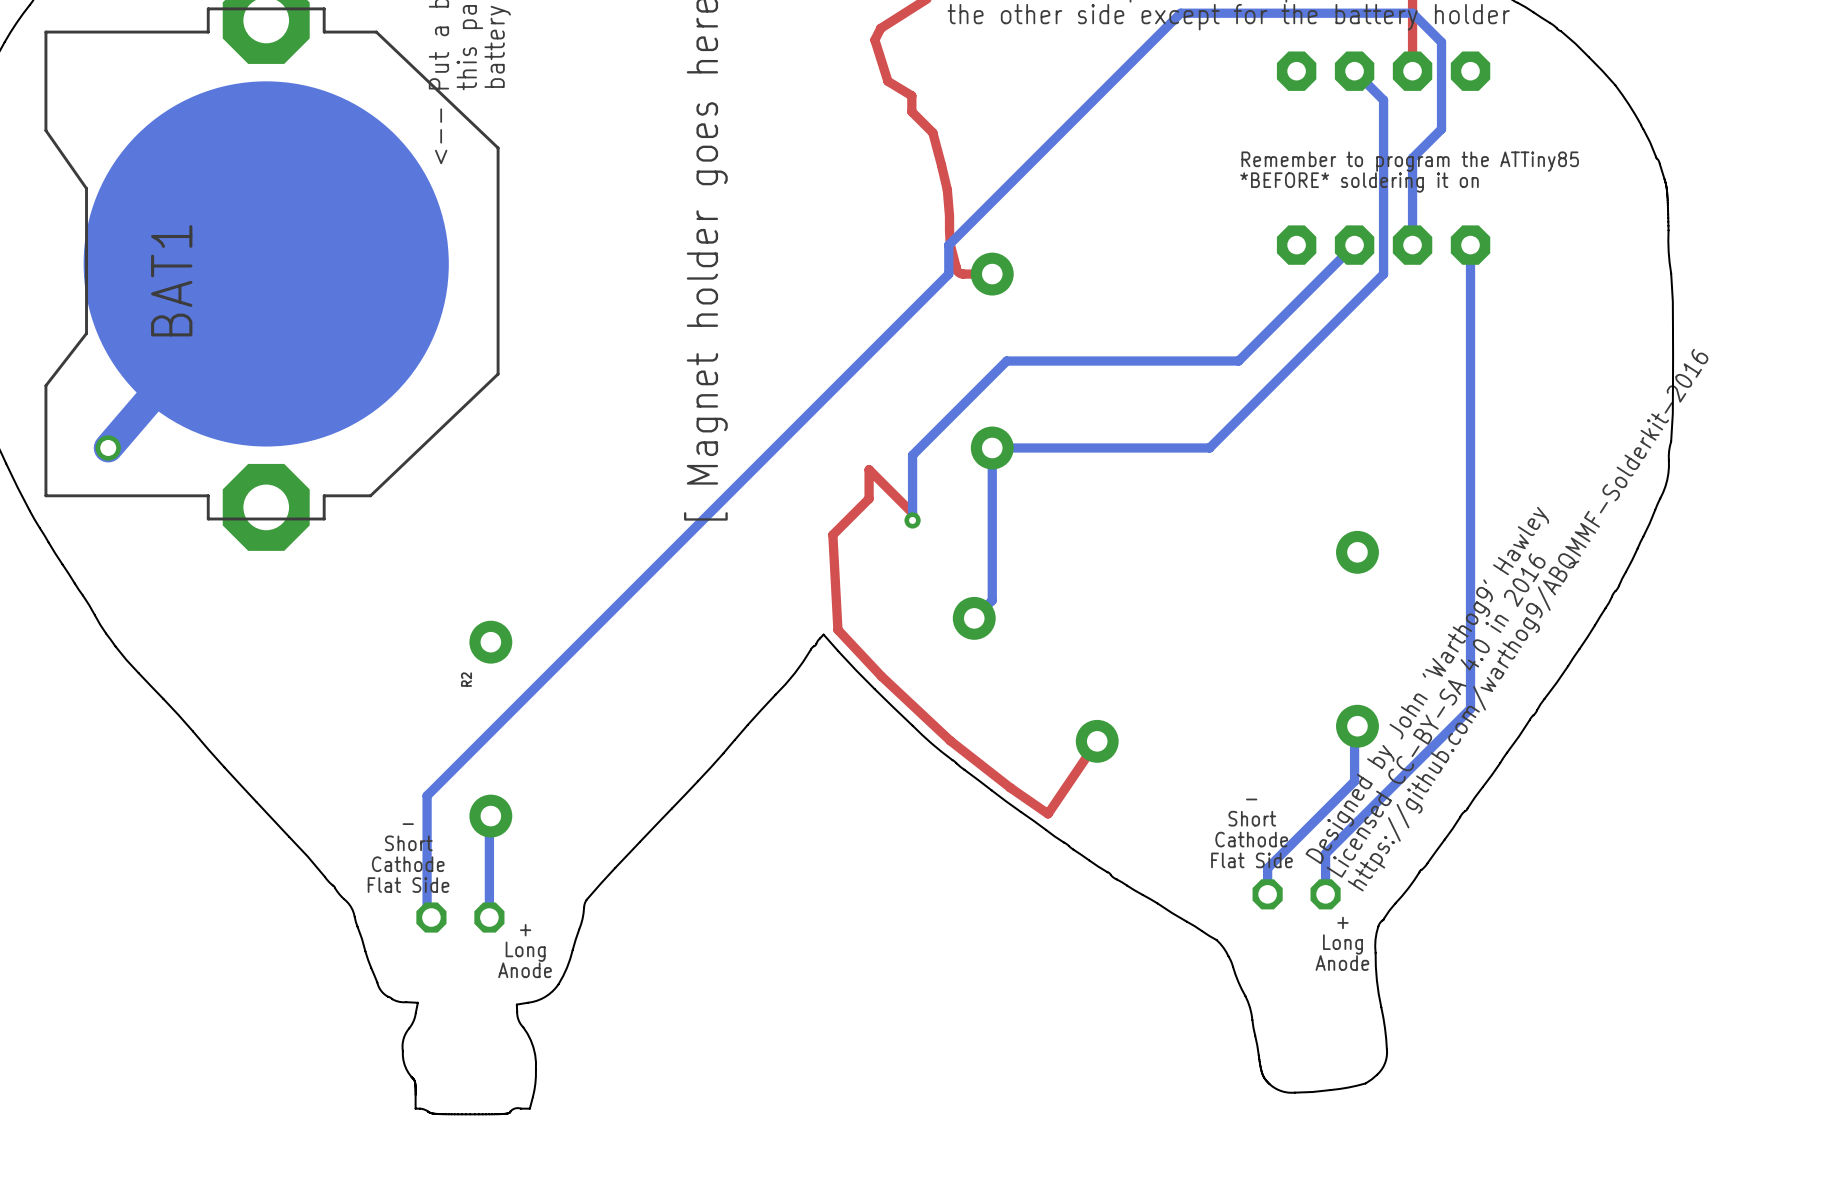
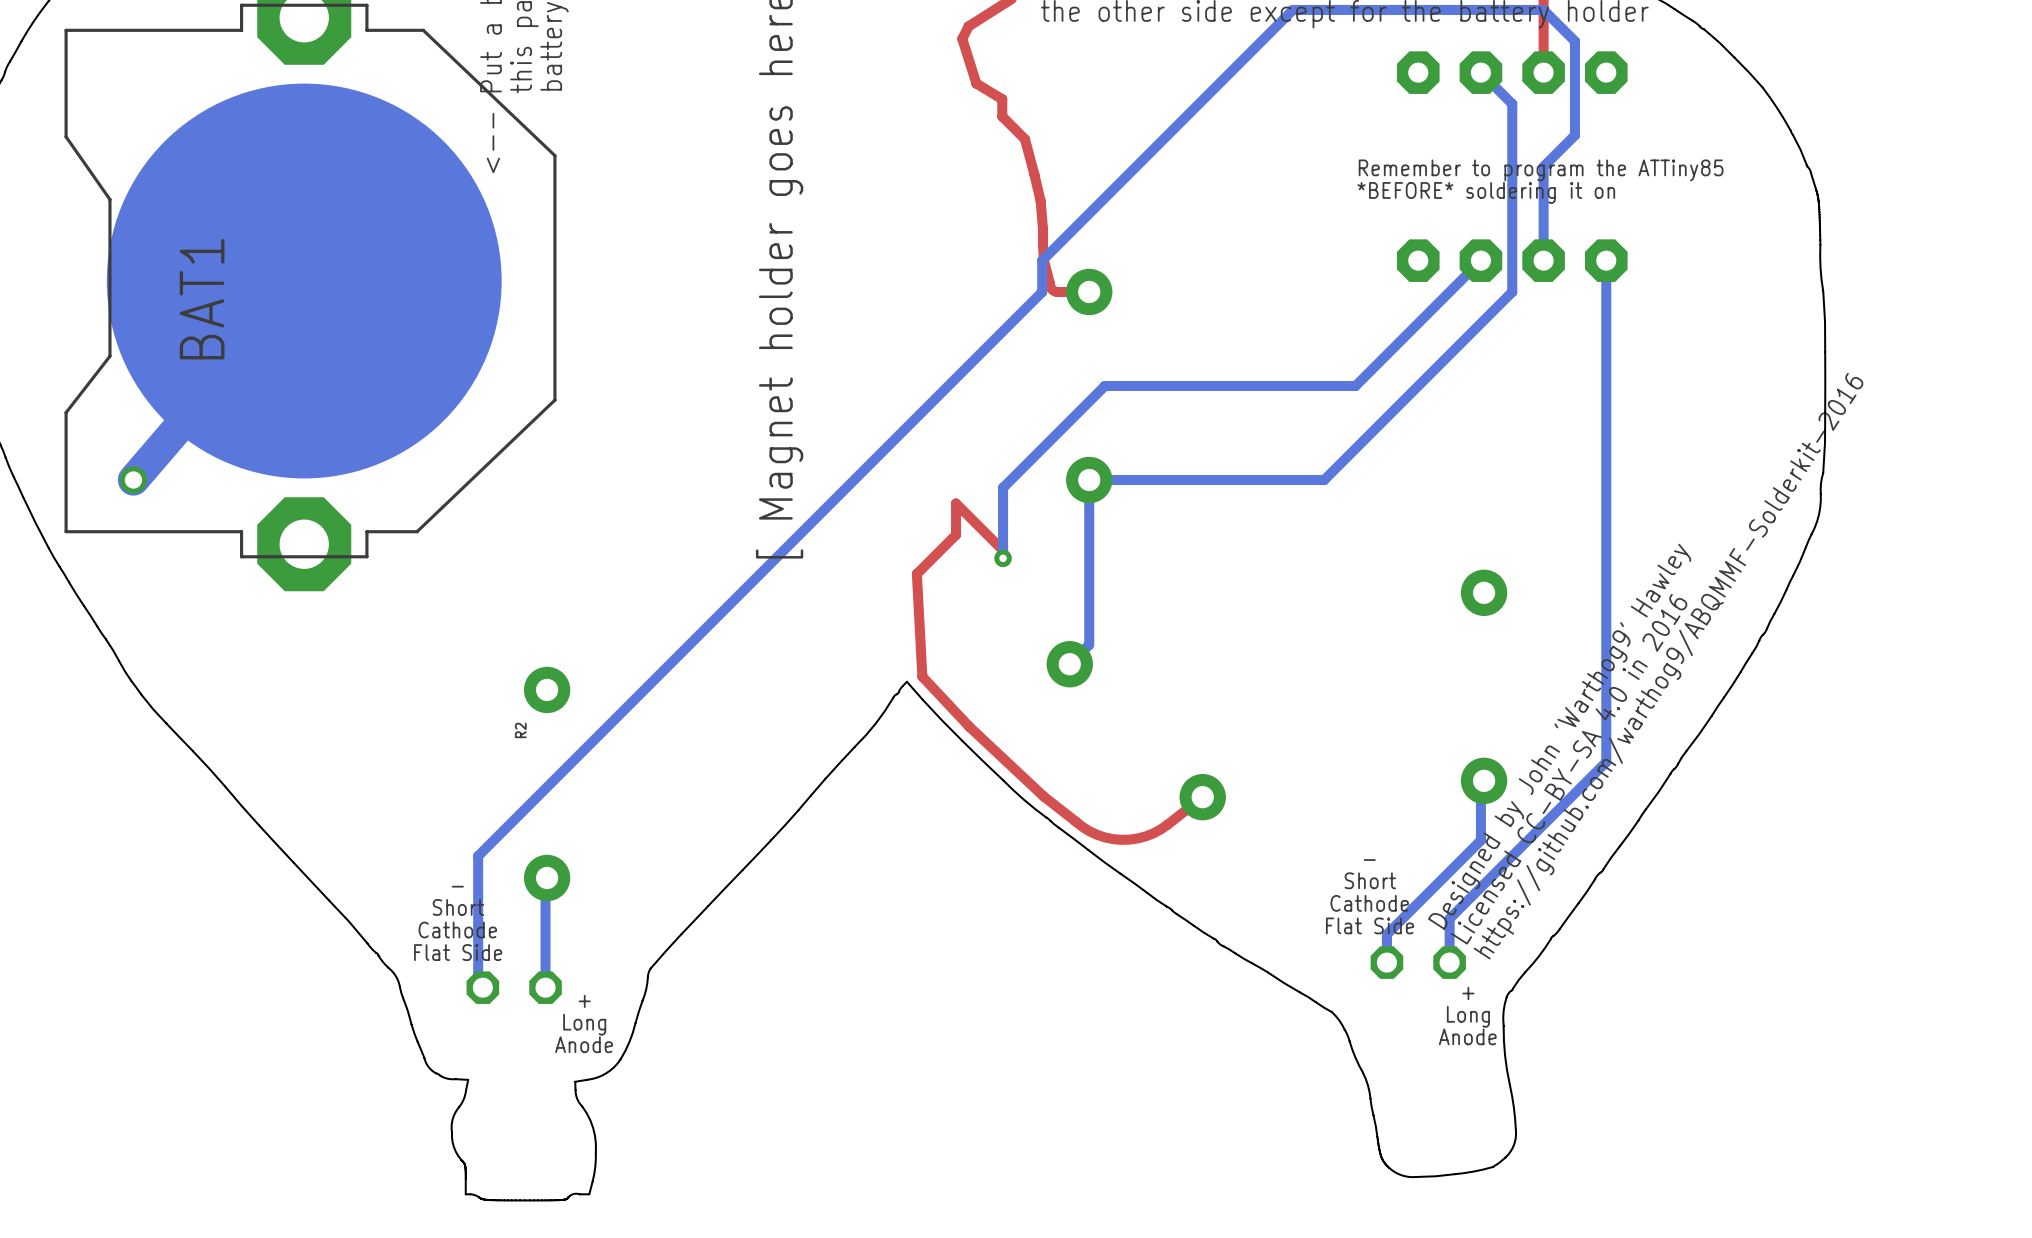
top track: (1097, 741) (1048, 813) (979, 764) -> (1202, 797) (1160, 829) (1137, 838) (1121, 839) (1104, 837) (1089, 831) (1075, 821)

